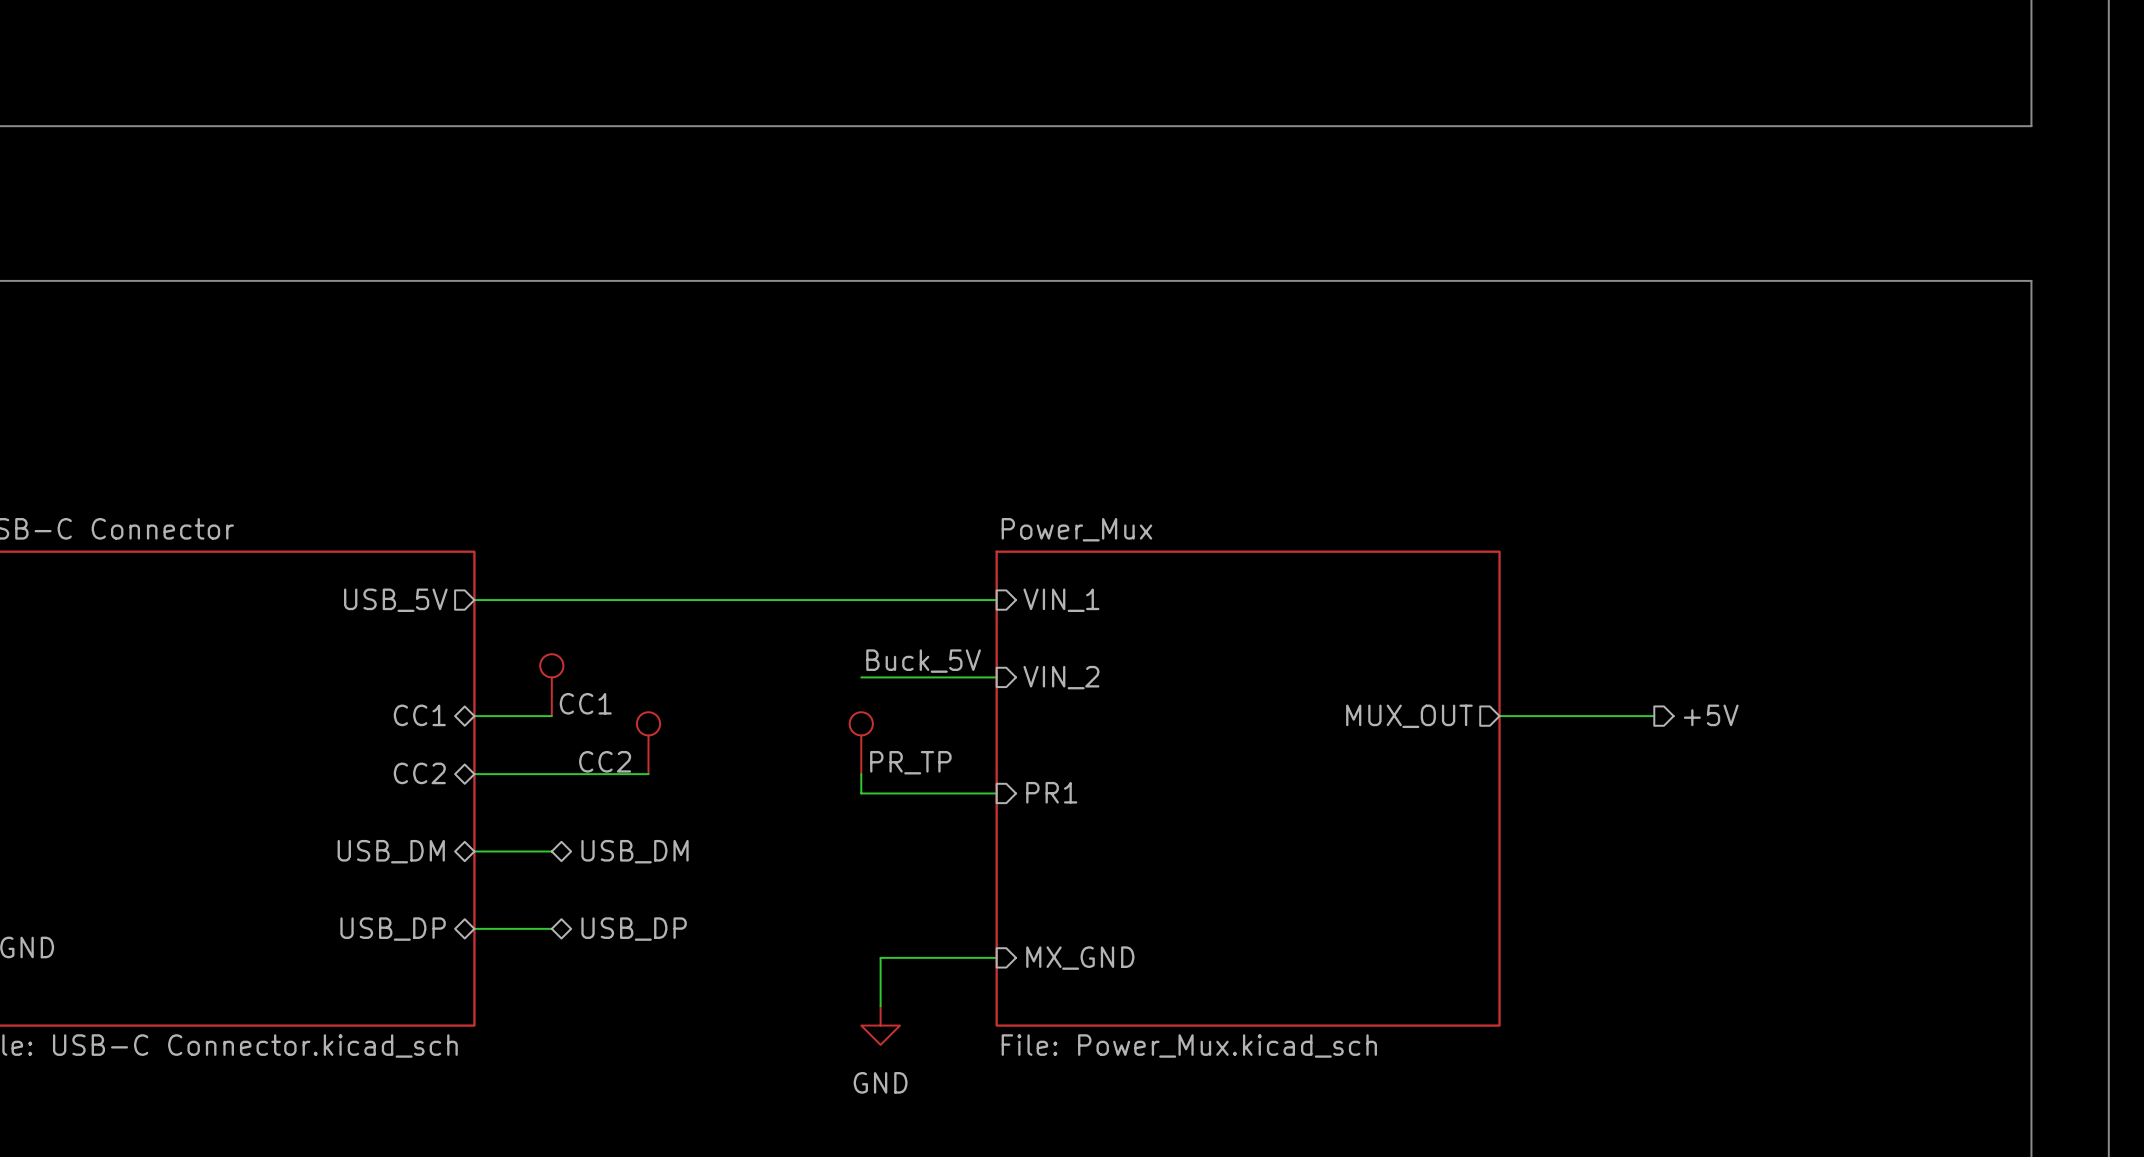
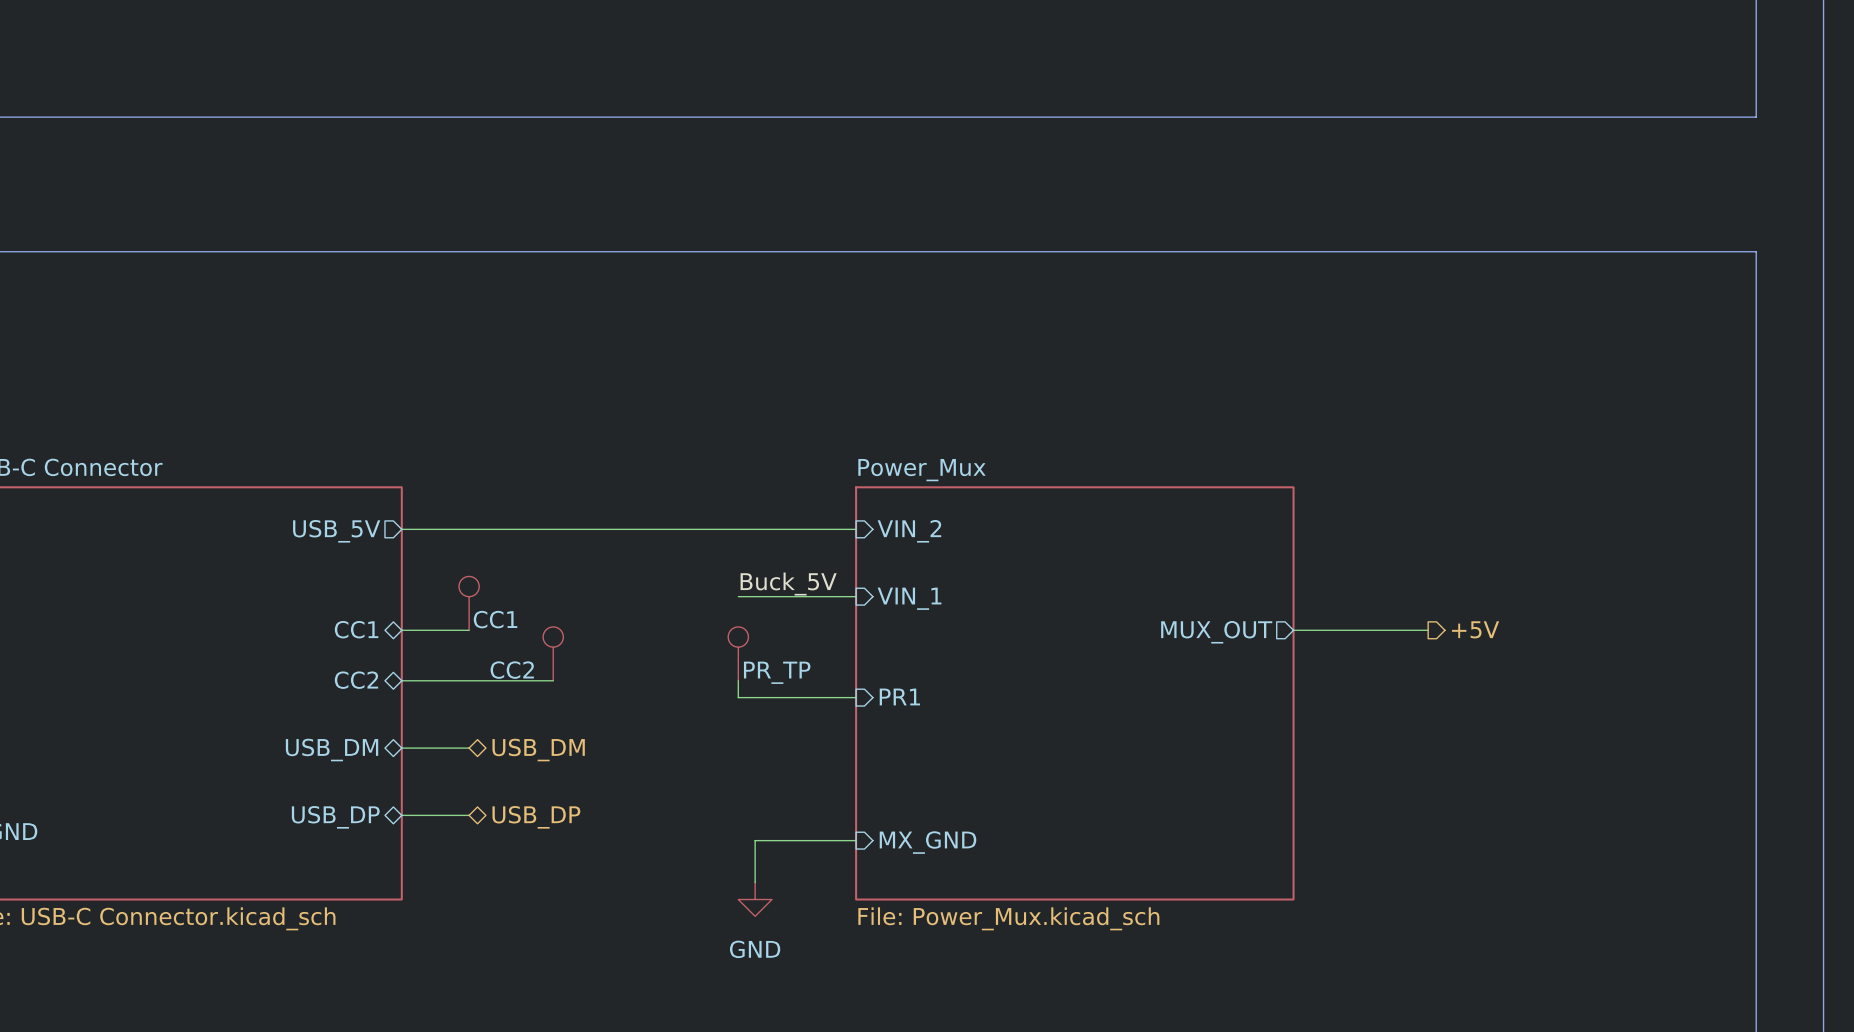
sheet pin: VIN_1 (1061, 600) -> VIN_2 (909, 531)
sheet pin: VIN_2 (1061, 677) -> VIN_1 (909, 598)

